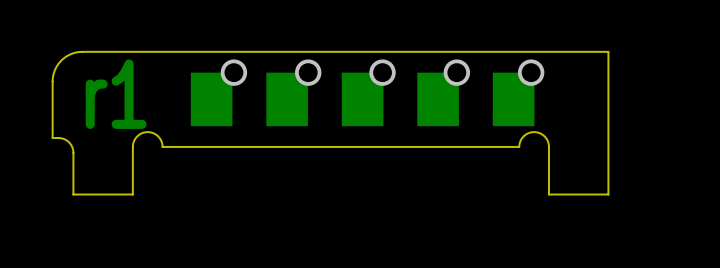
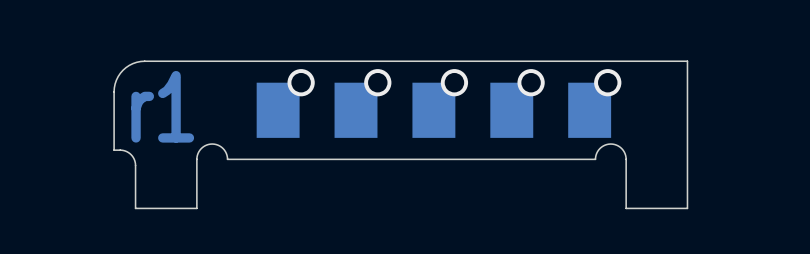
text position: r1 (116, 94) -> r1 (162, 106)

